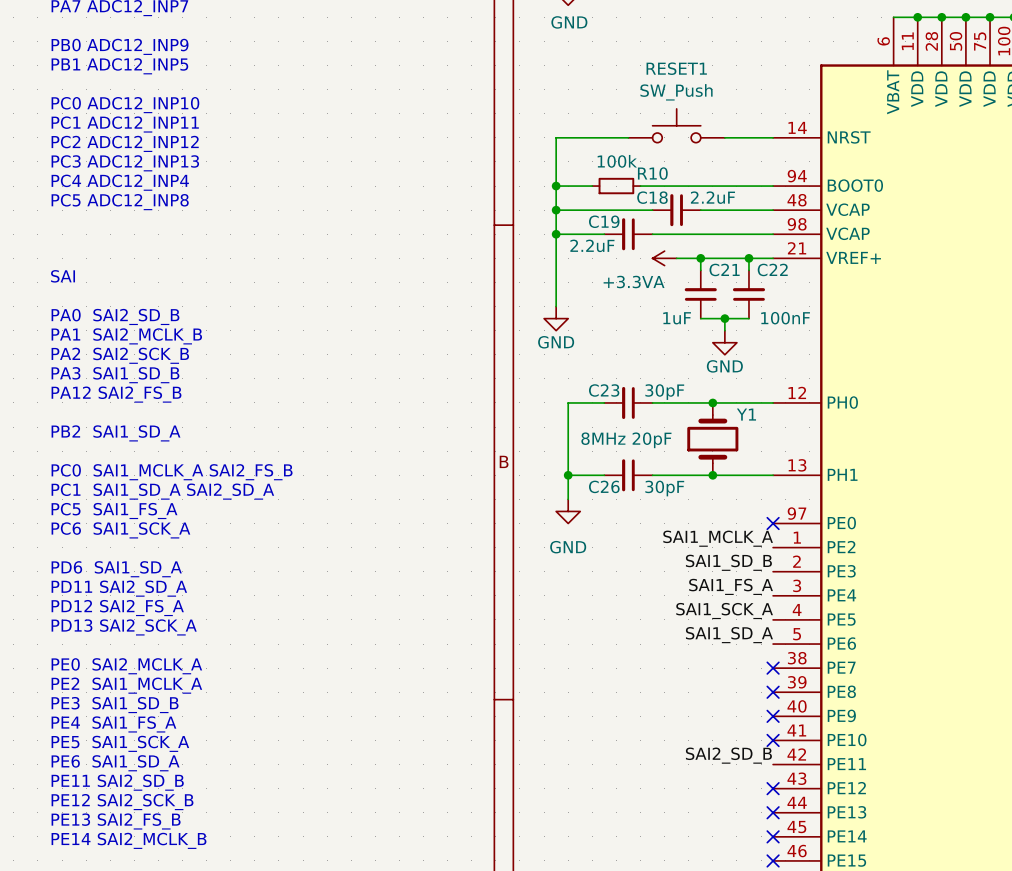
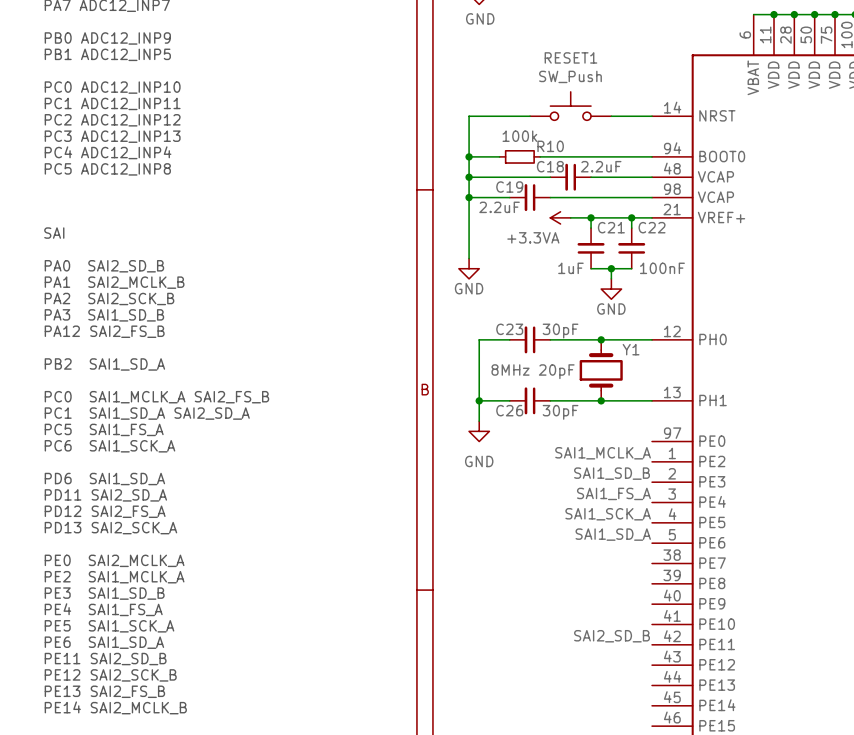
no-connect mark: (773, 523) -> none
no-connect mark: (773, 668) -> none
no-connect mark: (773, 692) -> none
no-connect mark: (773, 716) -> none
no-connect mark: (773, 740) -> none
no-connect mark: (773, 788) -> none
no-connect mark: (773, 812) -> none
no-connect mark: (773, 836) -> none
no-connect mark: (773, 860) -> none

